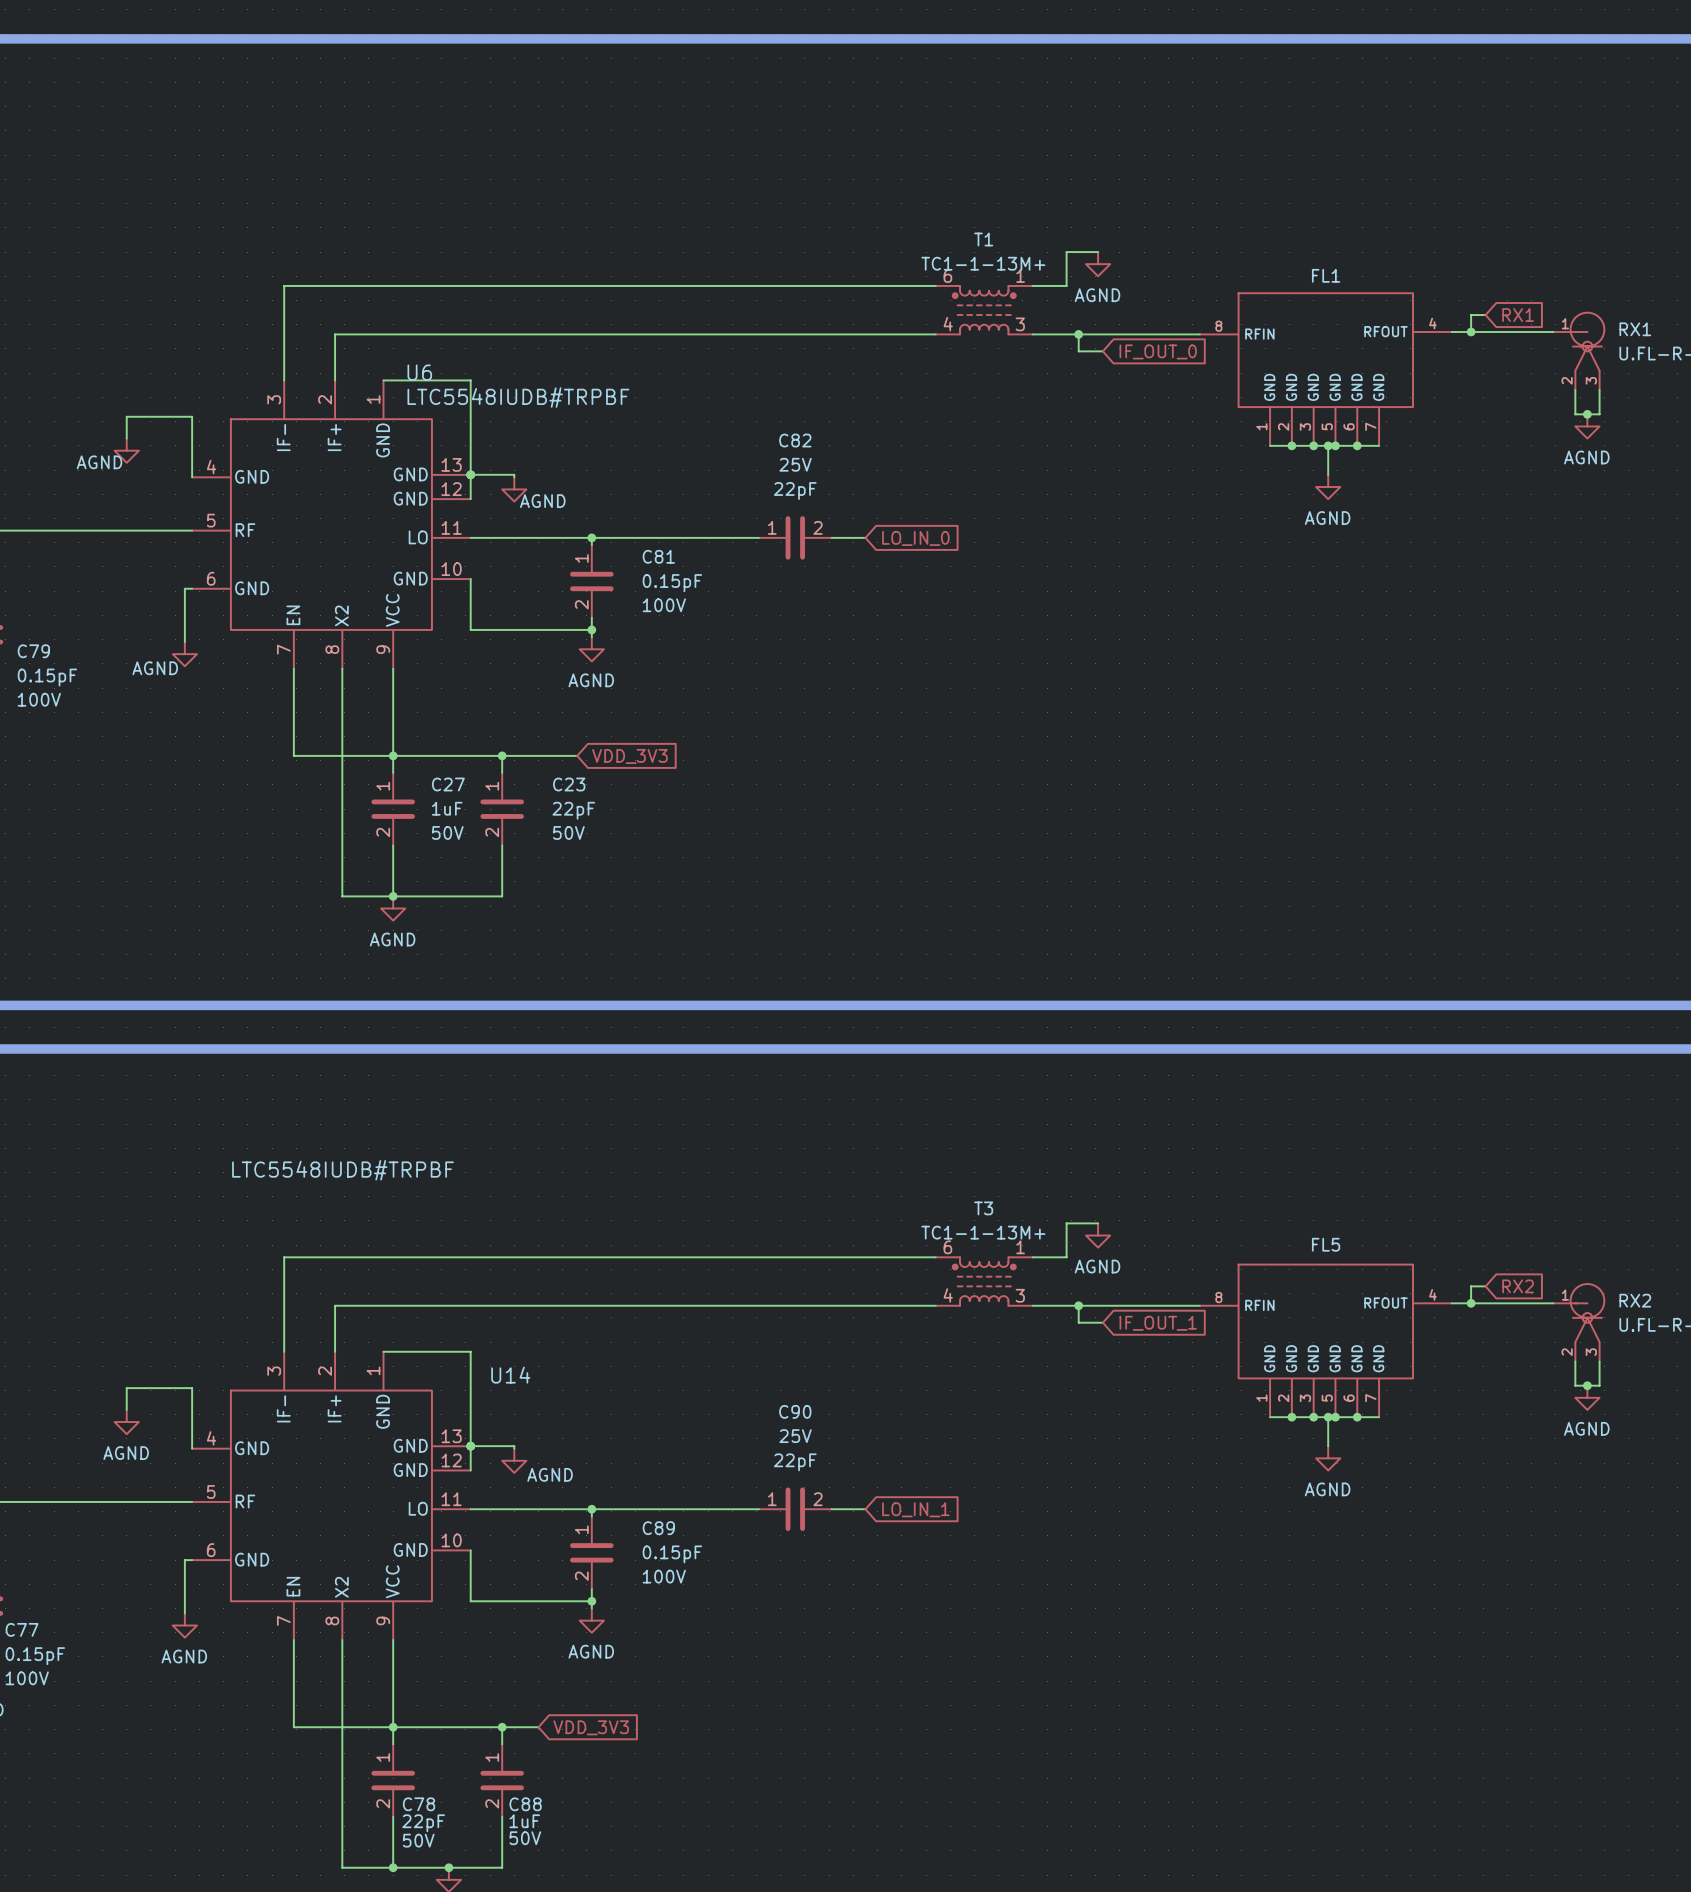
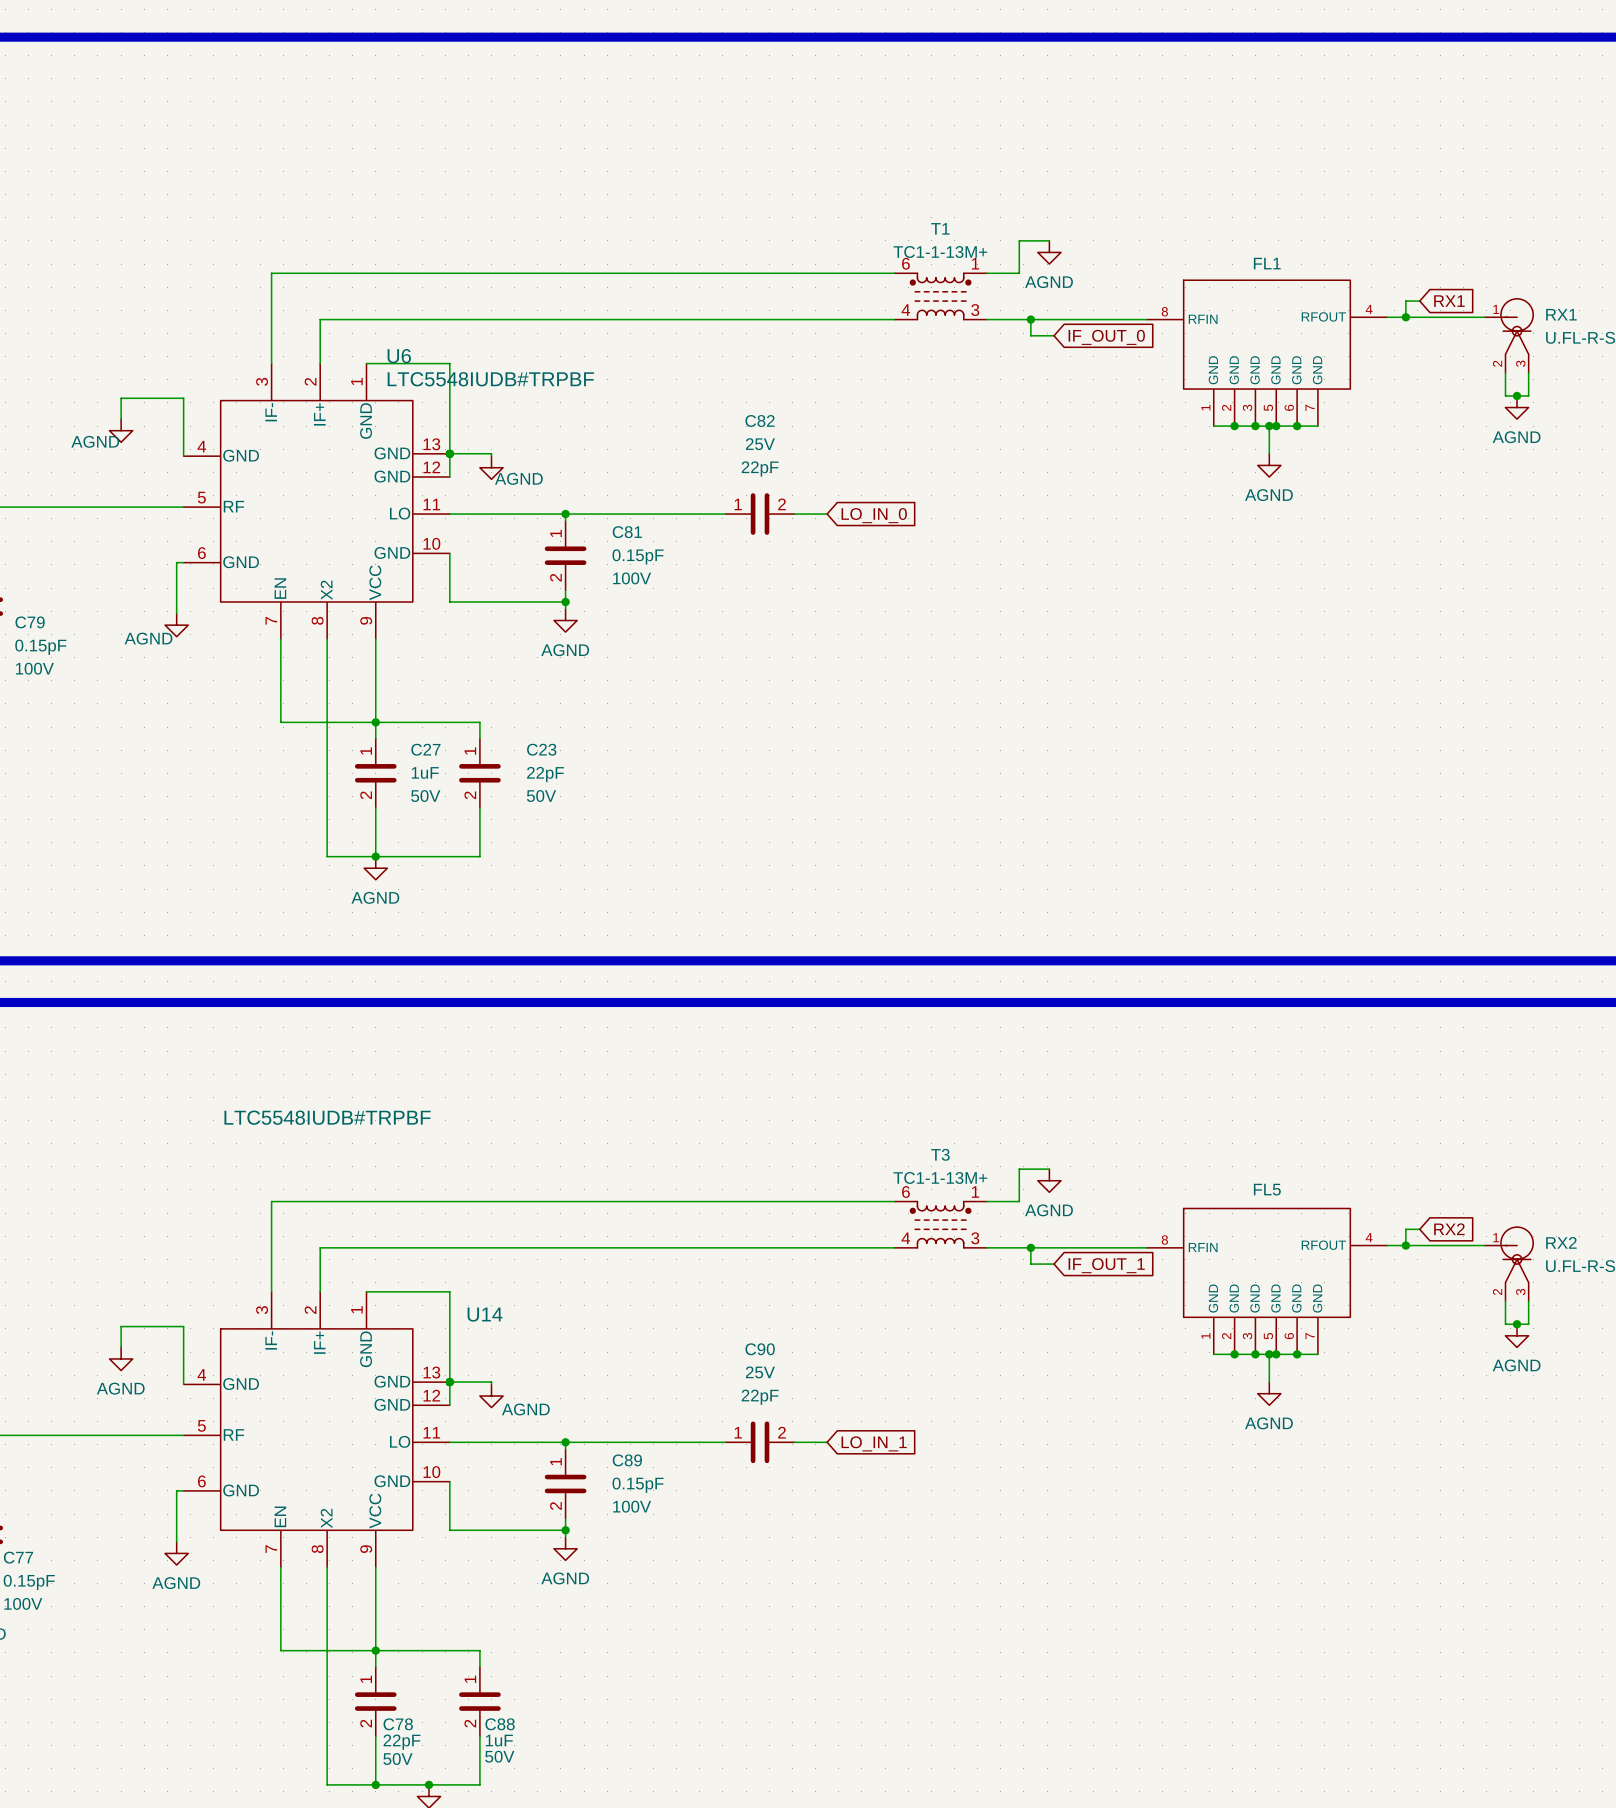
wire: (502, 755) (577, 755) -> none
junction: (502, 755) -> none
global label: VDD_3V3 (629, 756) -> none
wire: (502, 1727) (538, 1727) -> none
junction: (502, 1727) -> none
global label: VDD_3V3 (591, 1727) -> none

